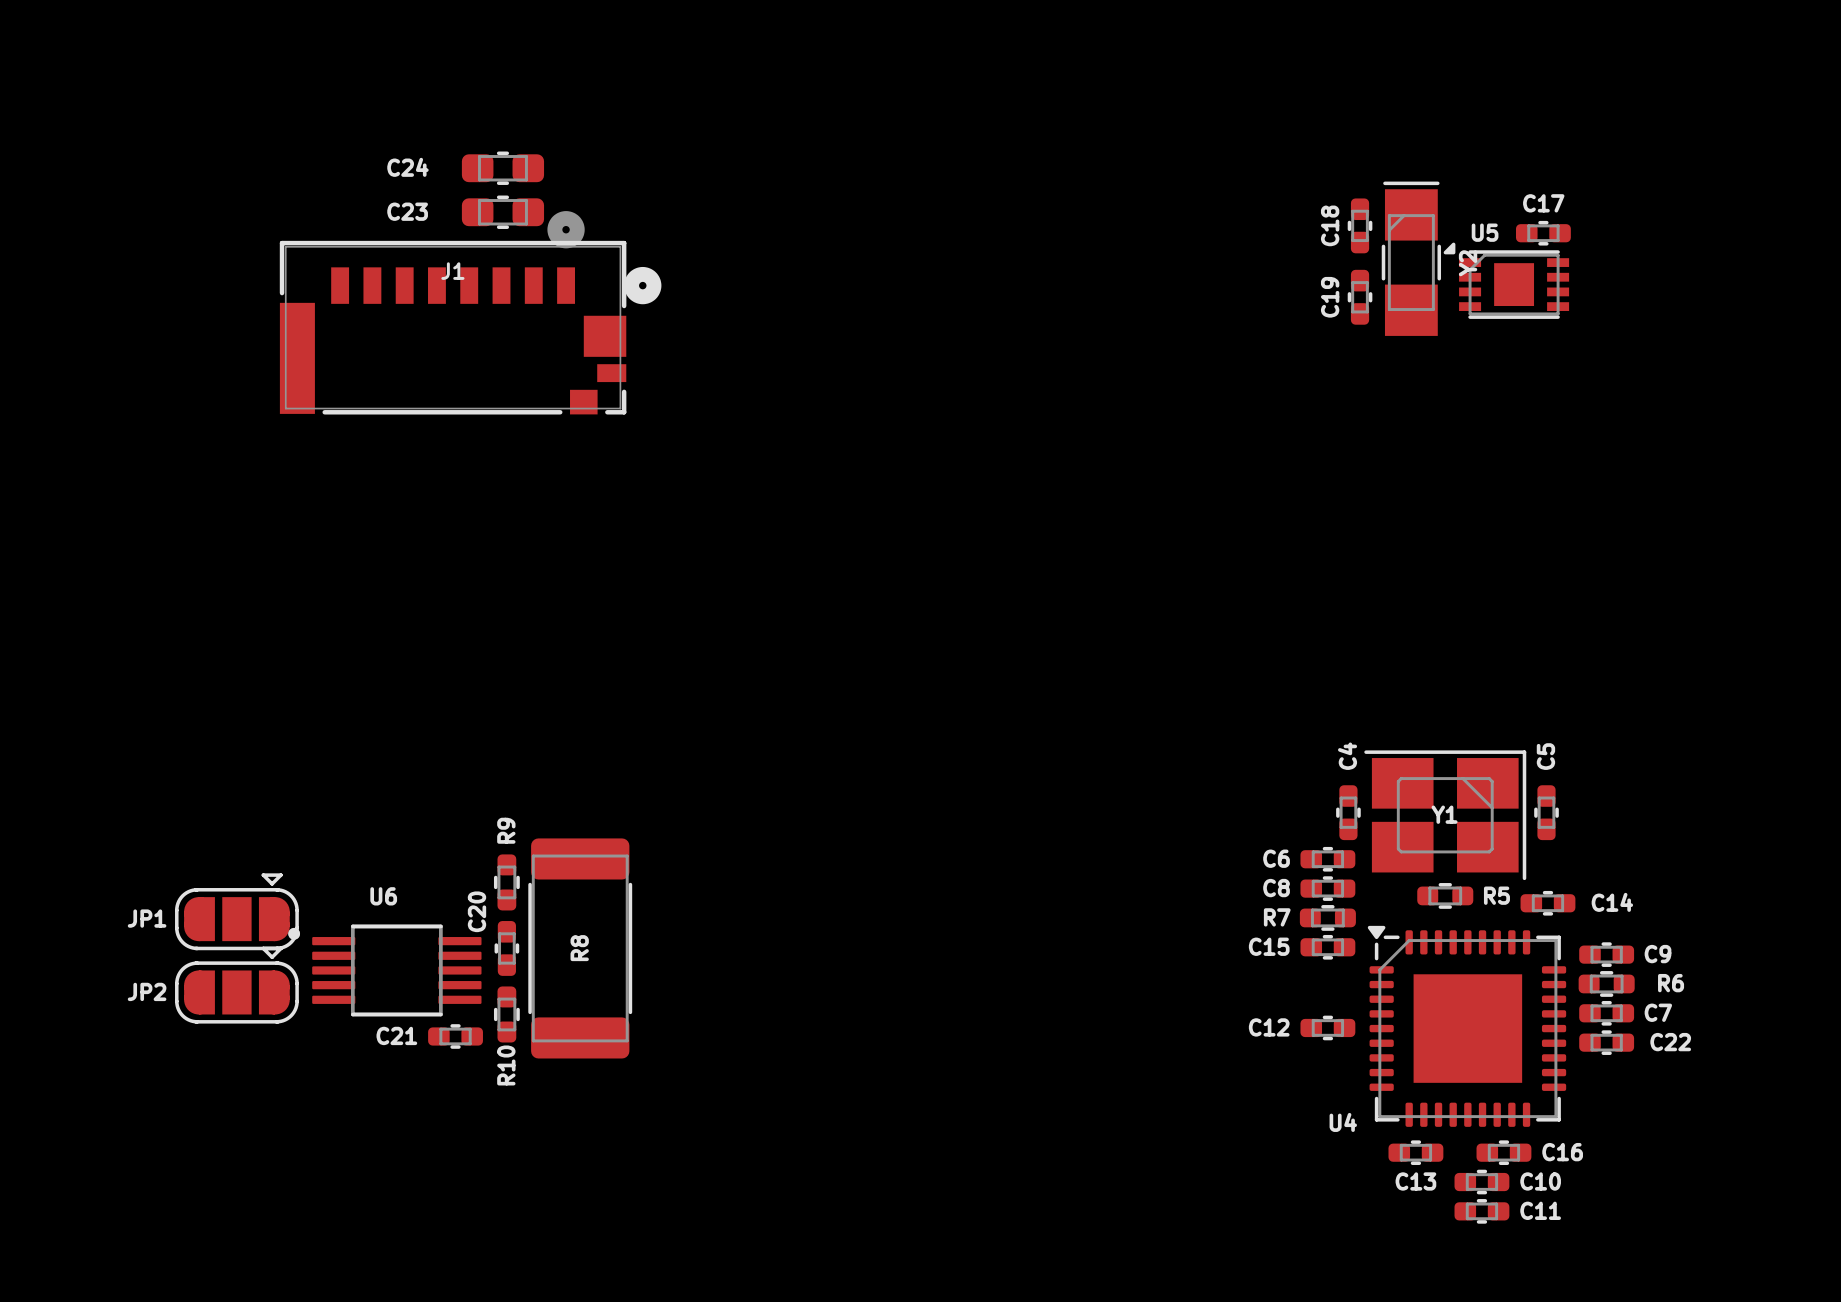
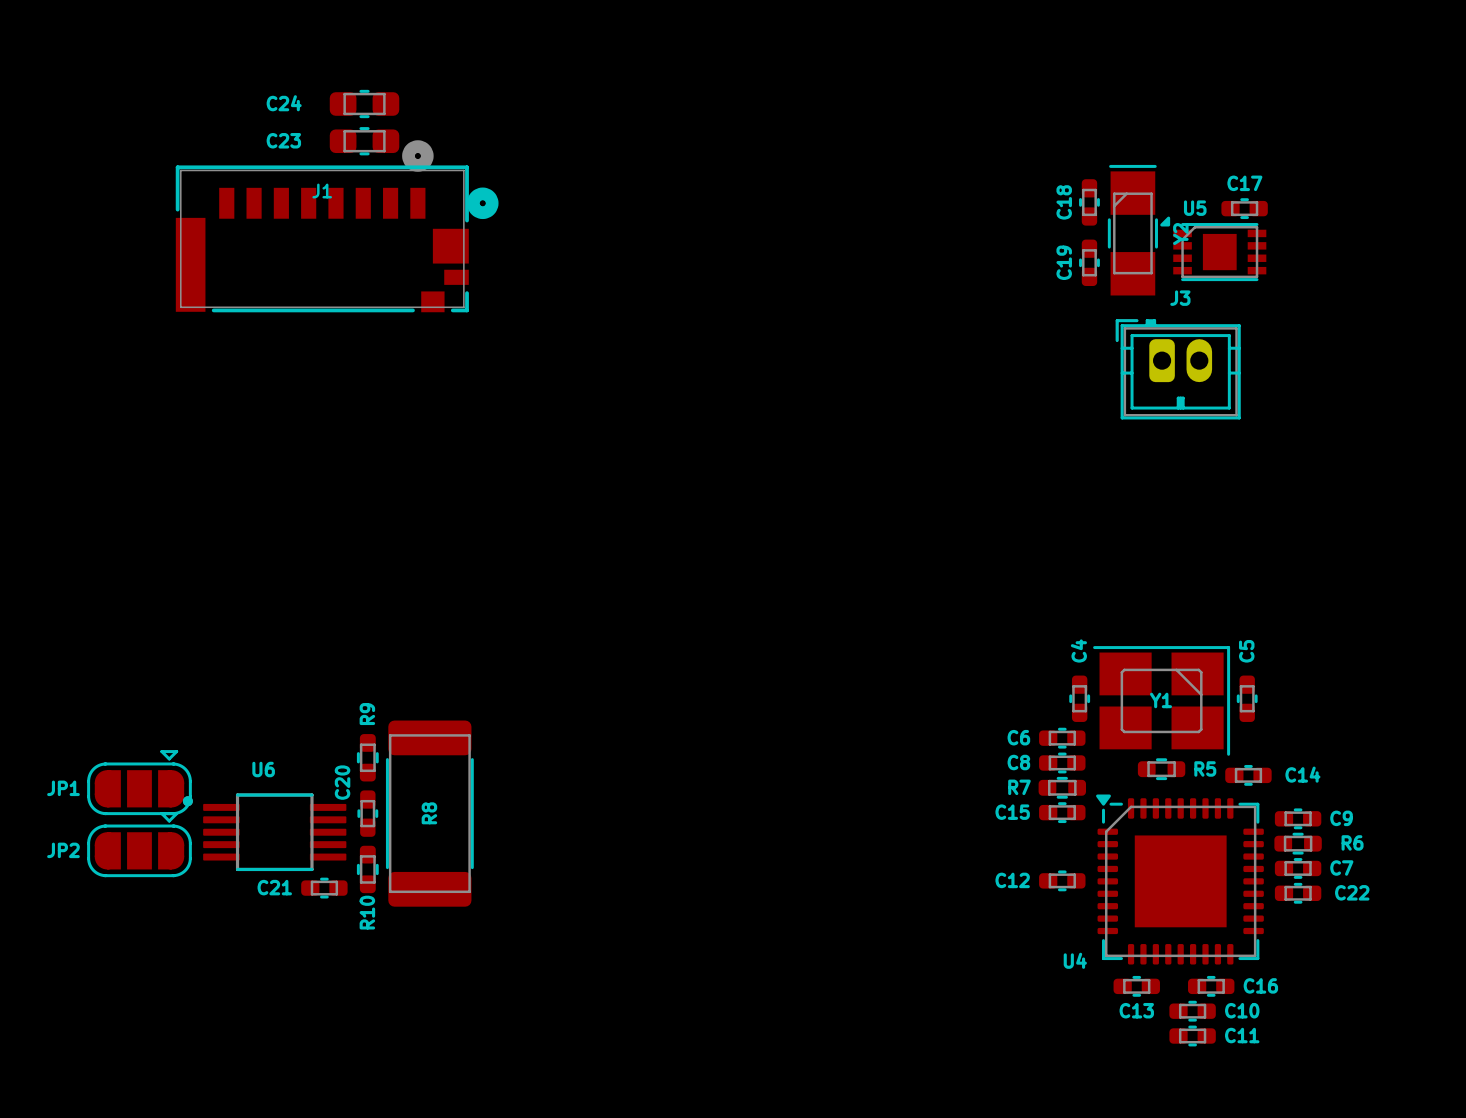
C24 position: (502, 168) -> (364, 104)
C23 position: (502, 212) -> (364, 141)
J1 position: (470, 312) -> (337, 226)
J3: none -> (1178, 369)

